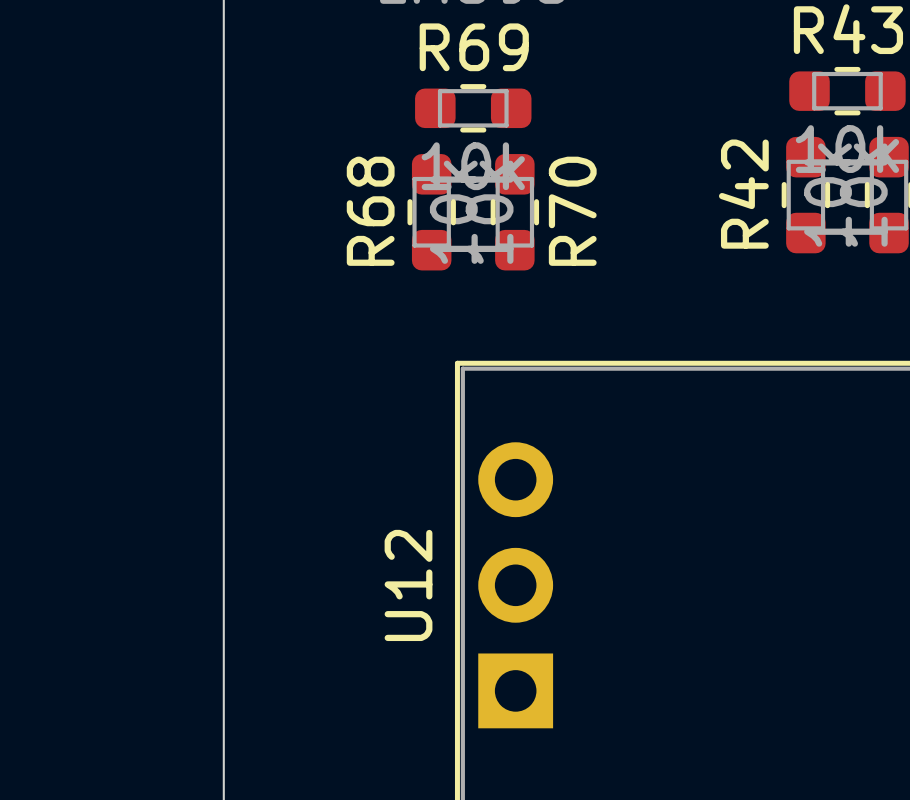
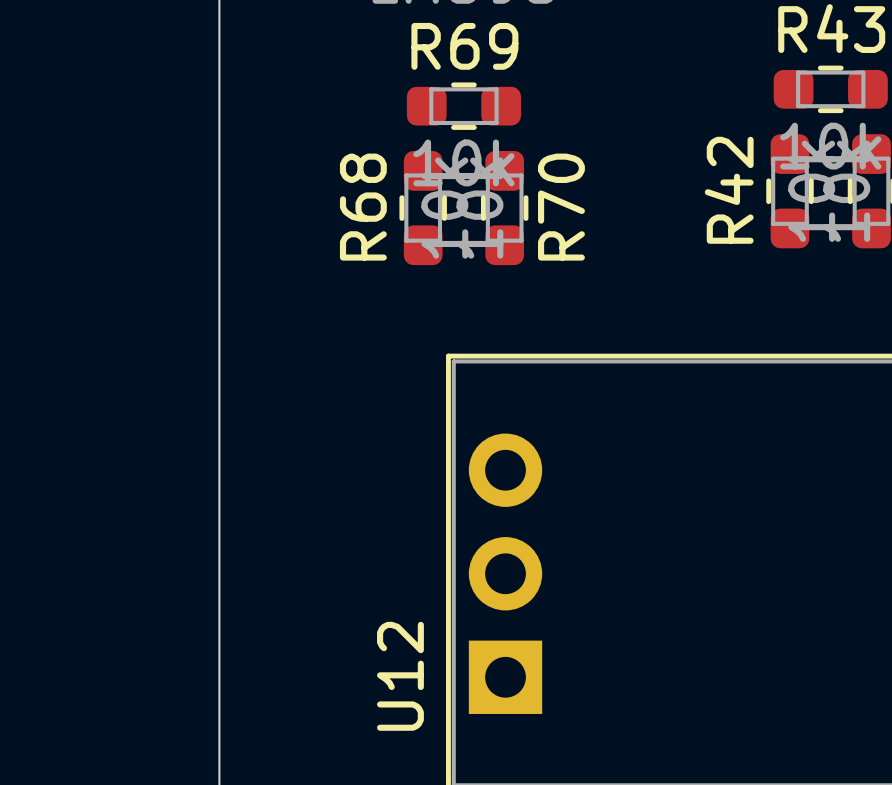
U12 name position: U12 (408, 585) -> U12 (400, 676)

